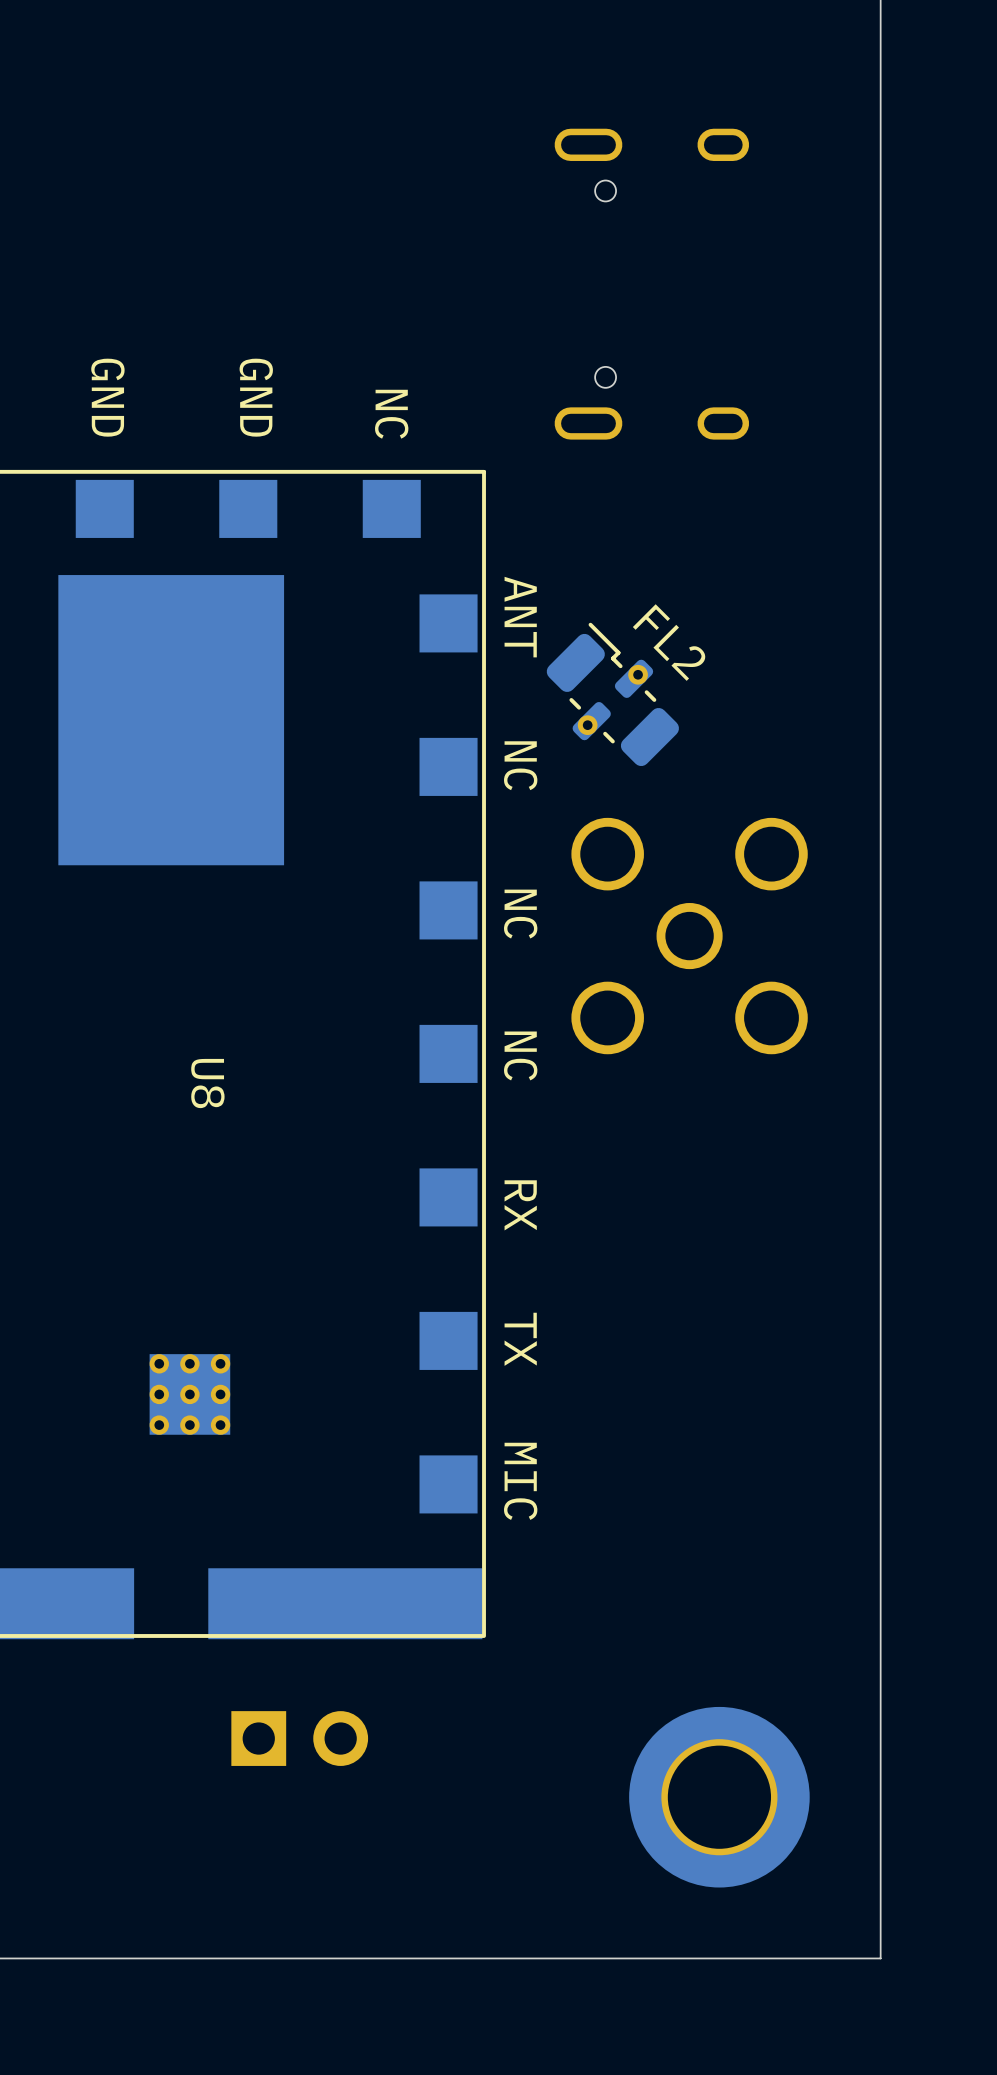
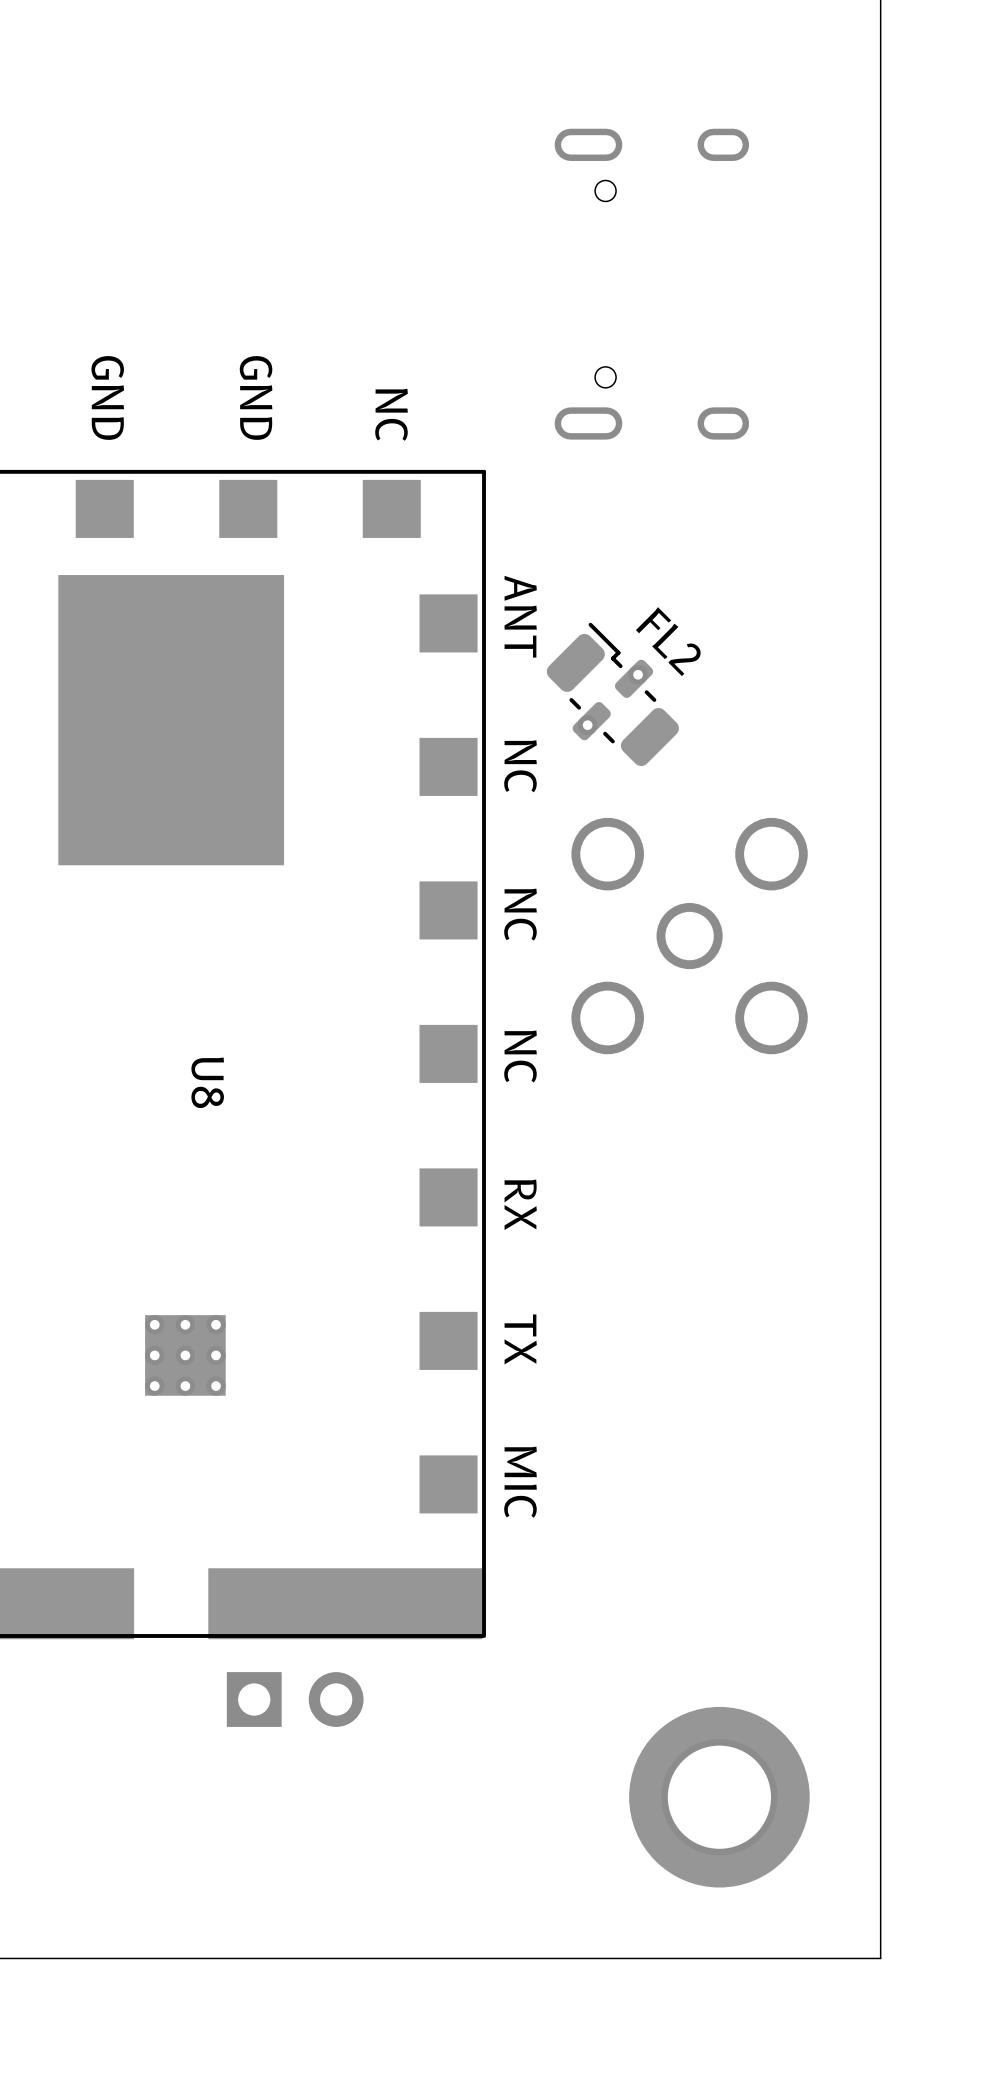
part position: (189, 1394) -> (185, 1355)
part position: (299, 1738) -> (295, 1699)

